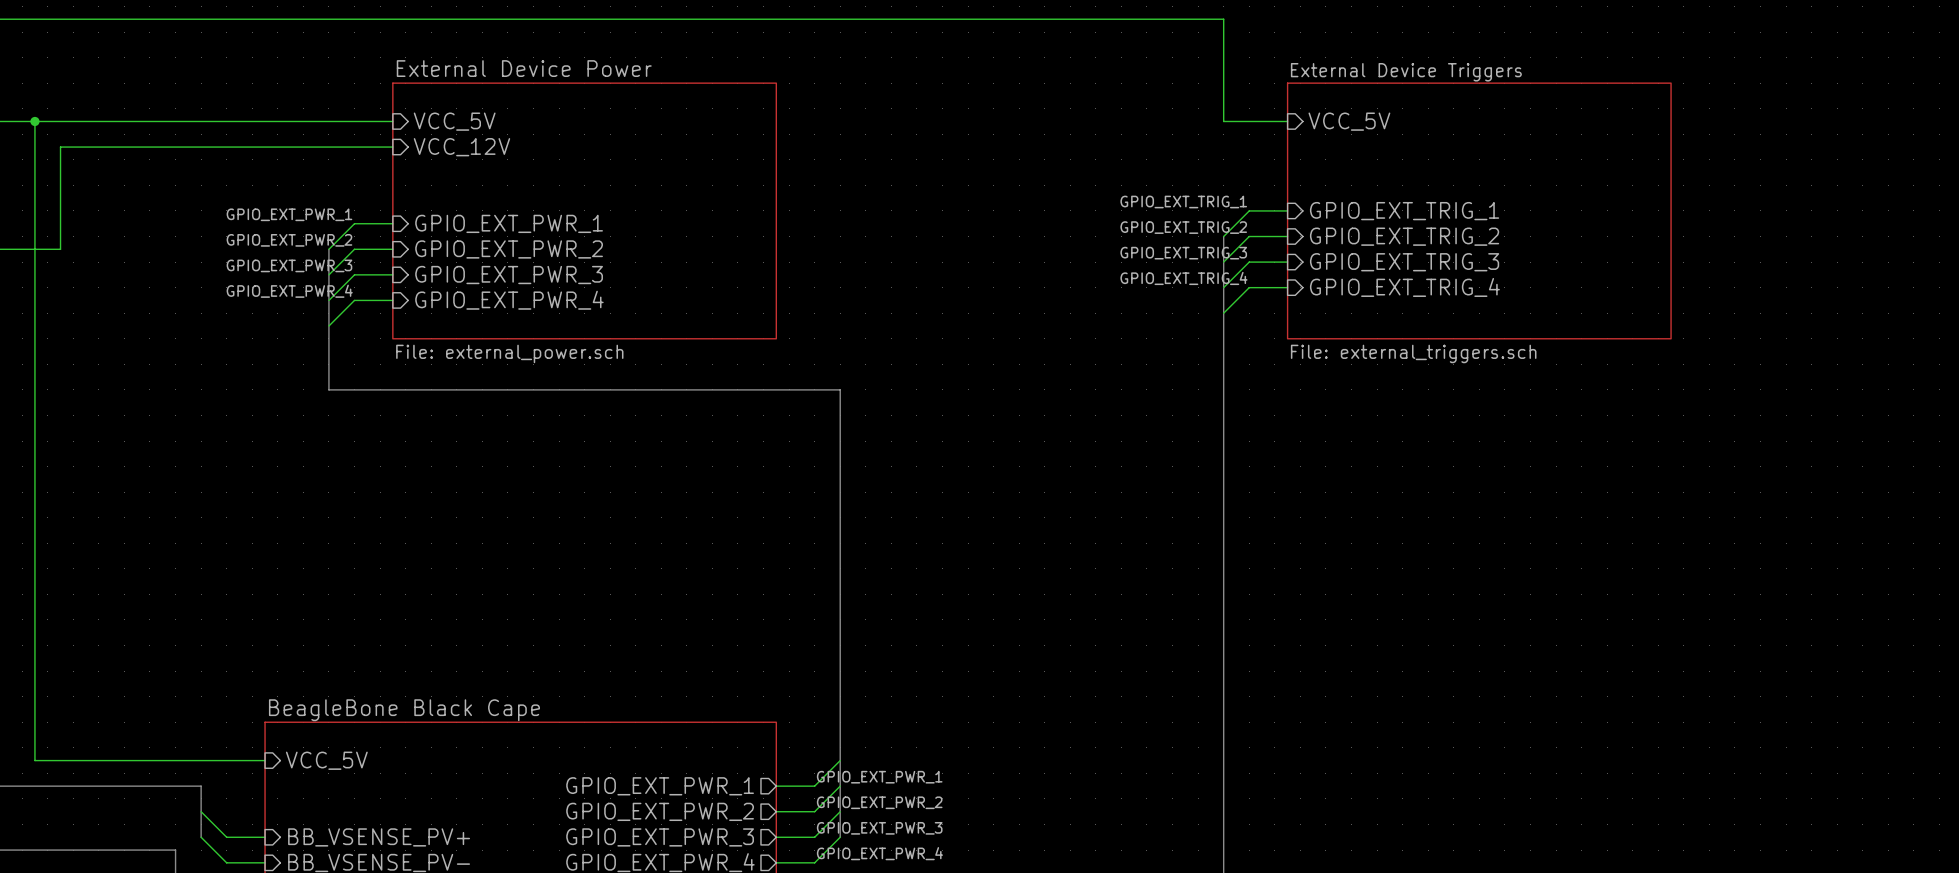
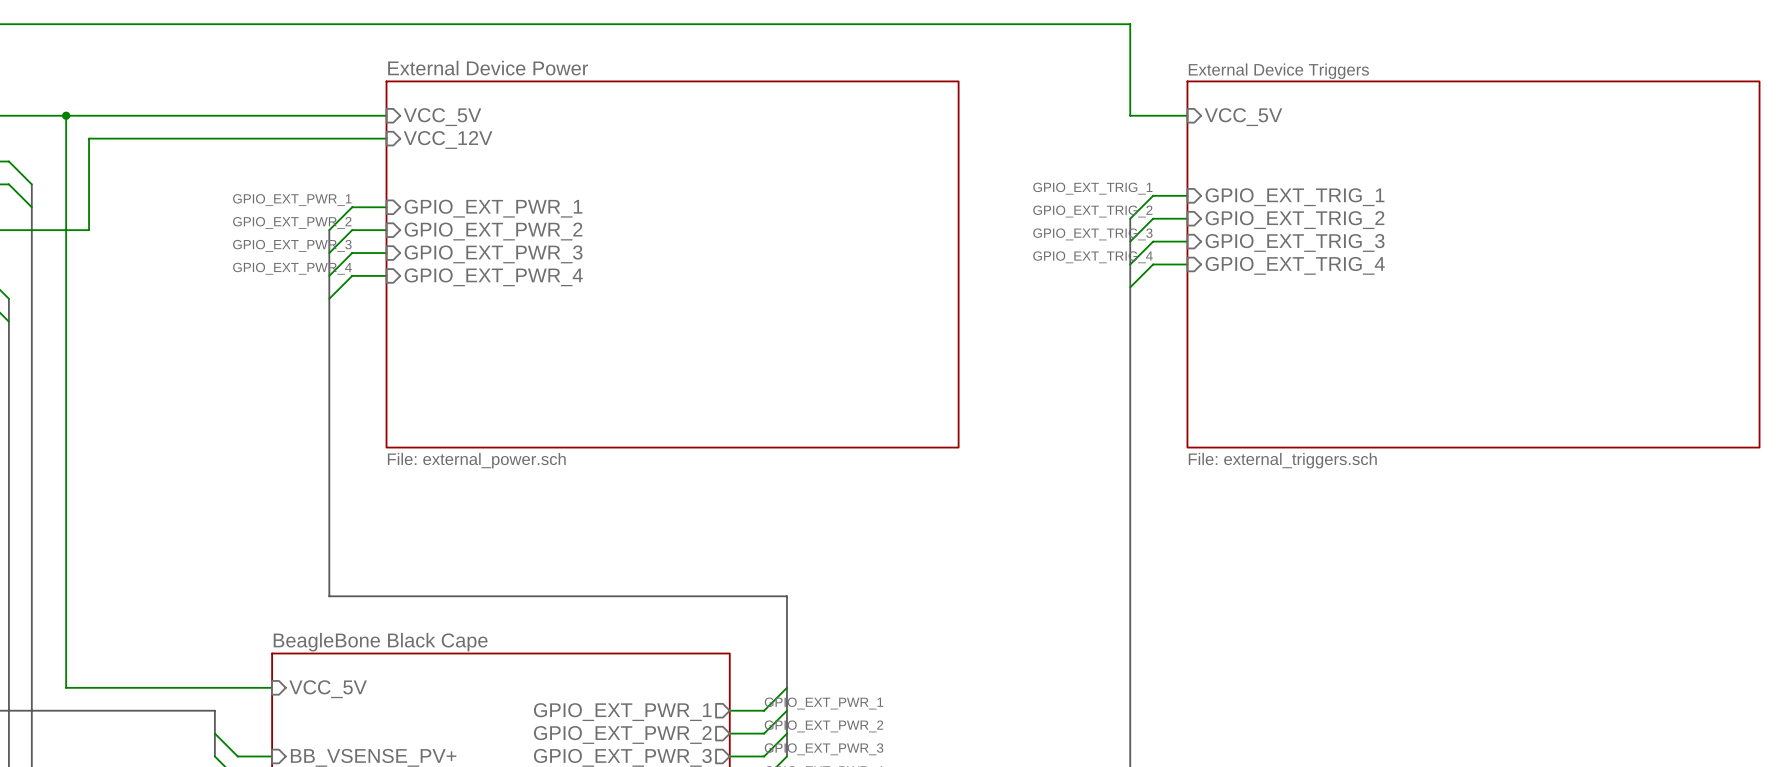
sheet External Device Power: File: external_power.sch (584, 210) -> none
sheet External Device Triggers: File: external_triggers.sch (1479, 210) -> none
sheet External Device Power: none -> File: external_power.sch (672, 264)
sheet External Device Triggers: none -> File: external_triggers.sch (1473, 264)
bus: (328, 389) (840, 389) (840, 658) -> (329, 356) (329, 596) (786, 596)

